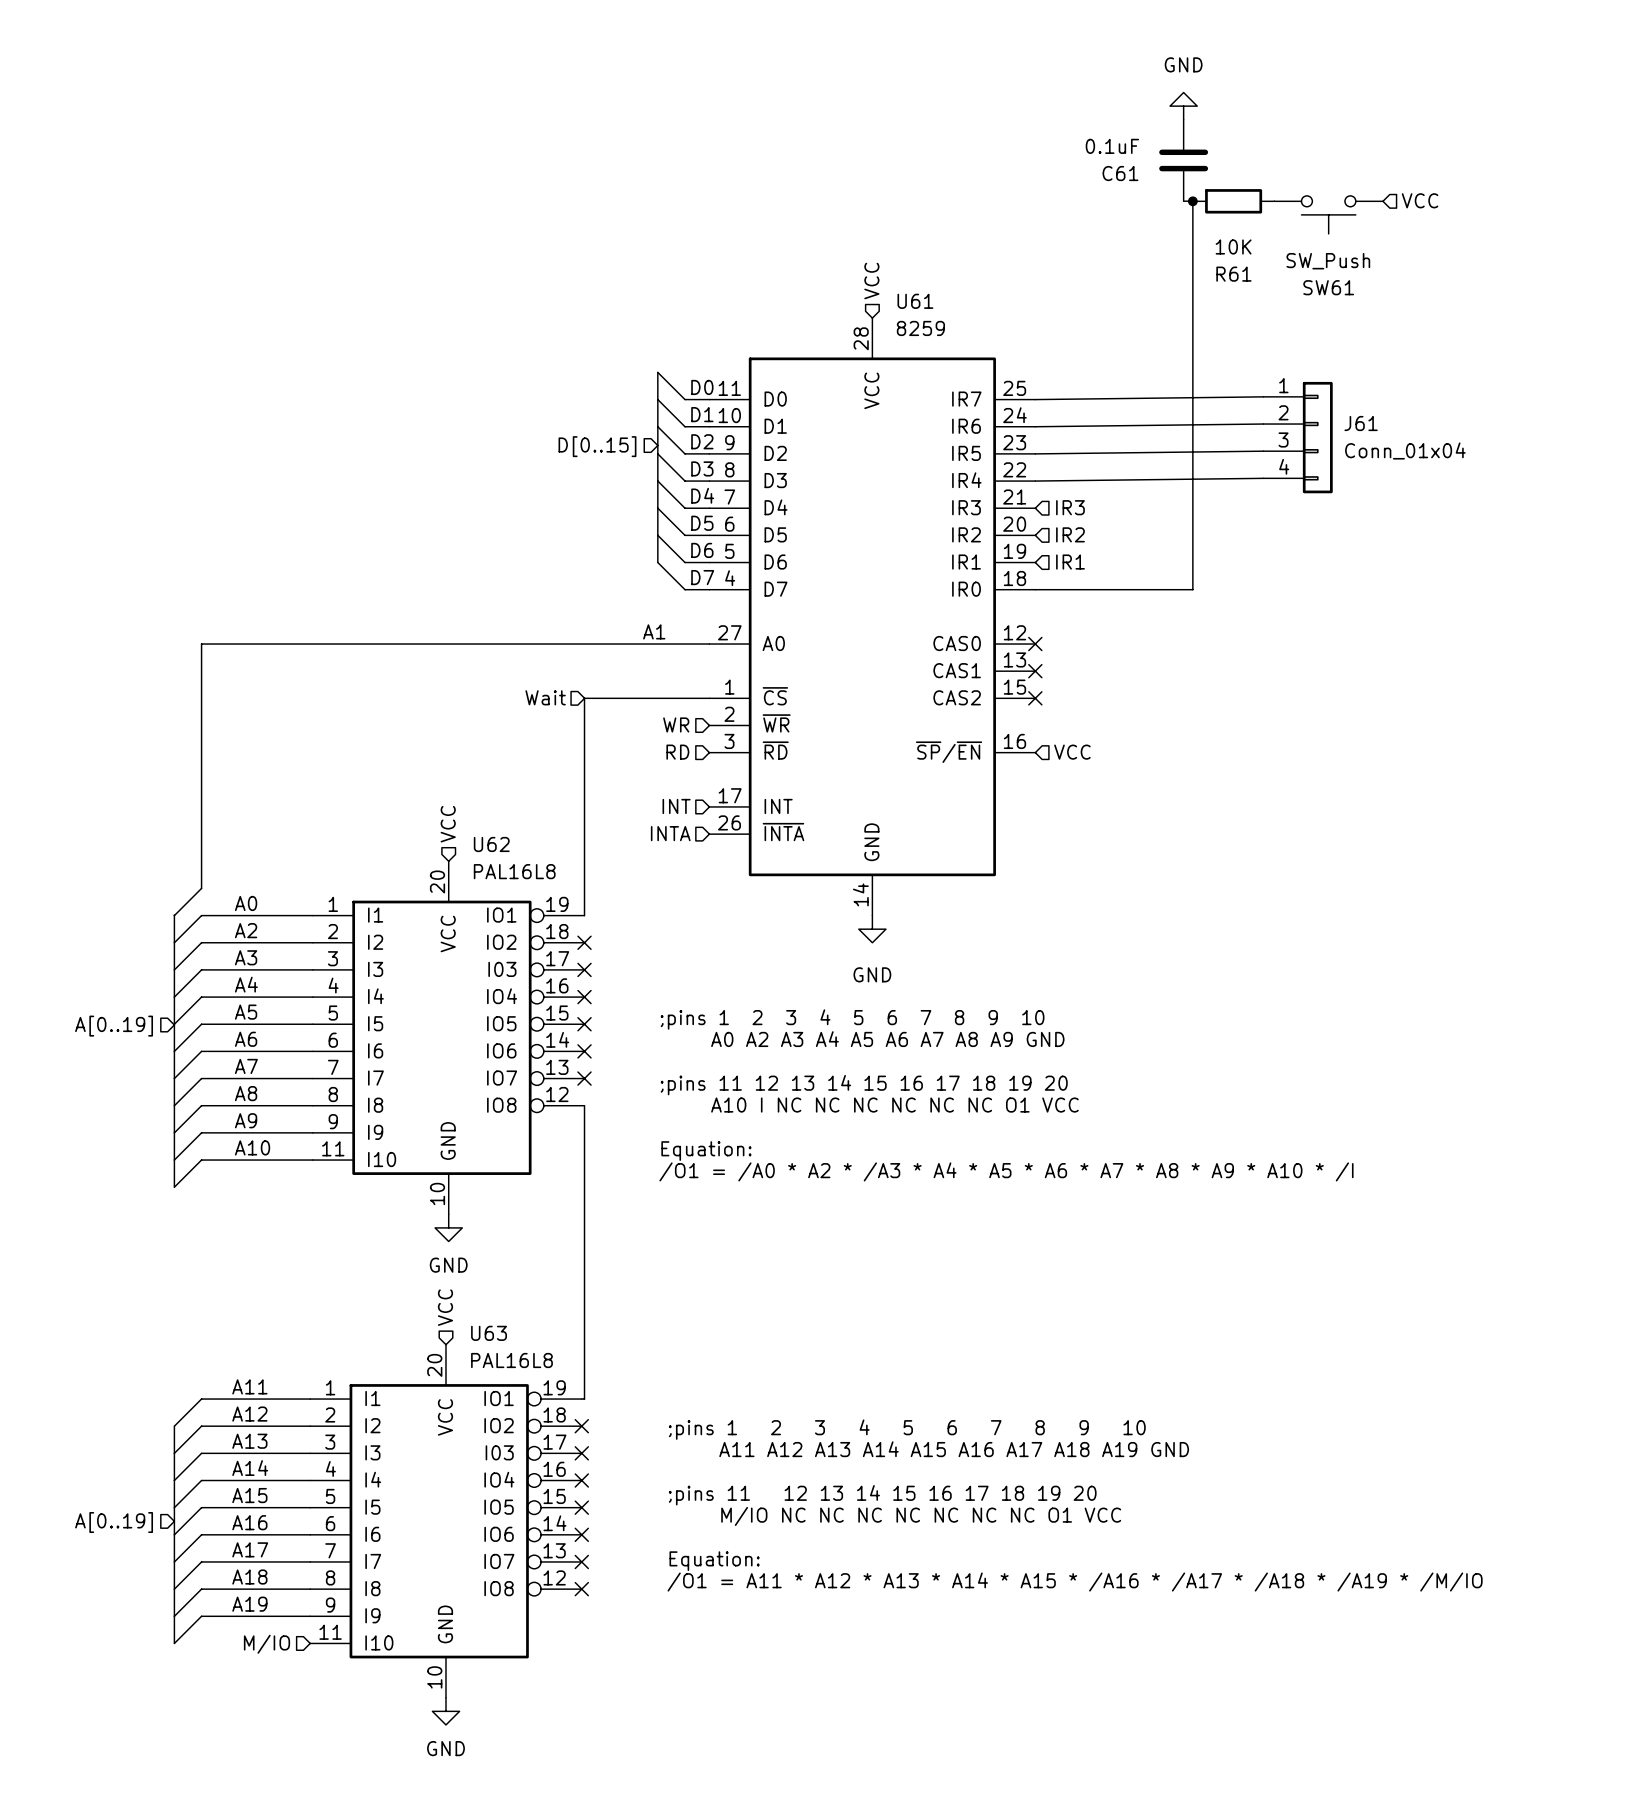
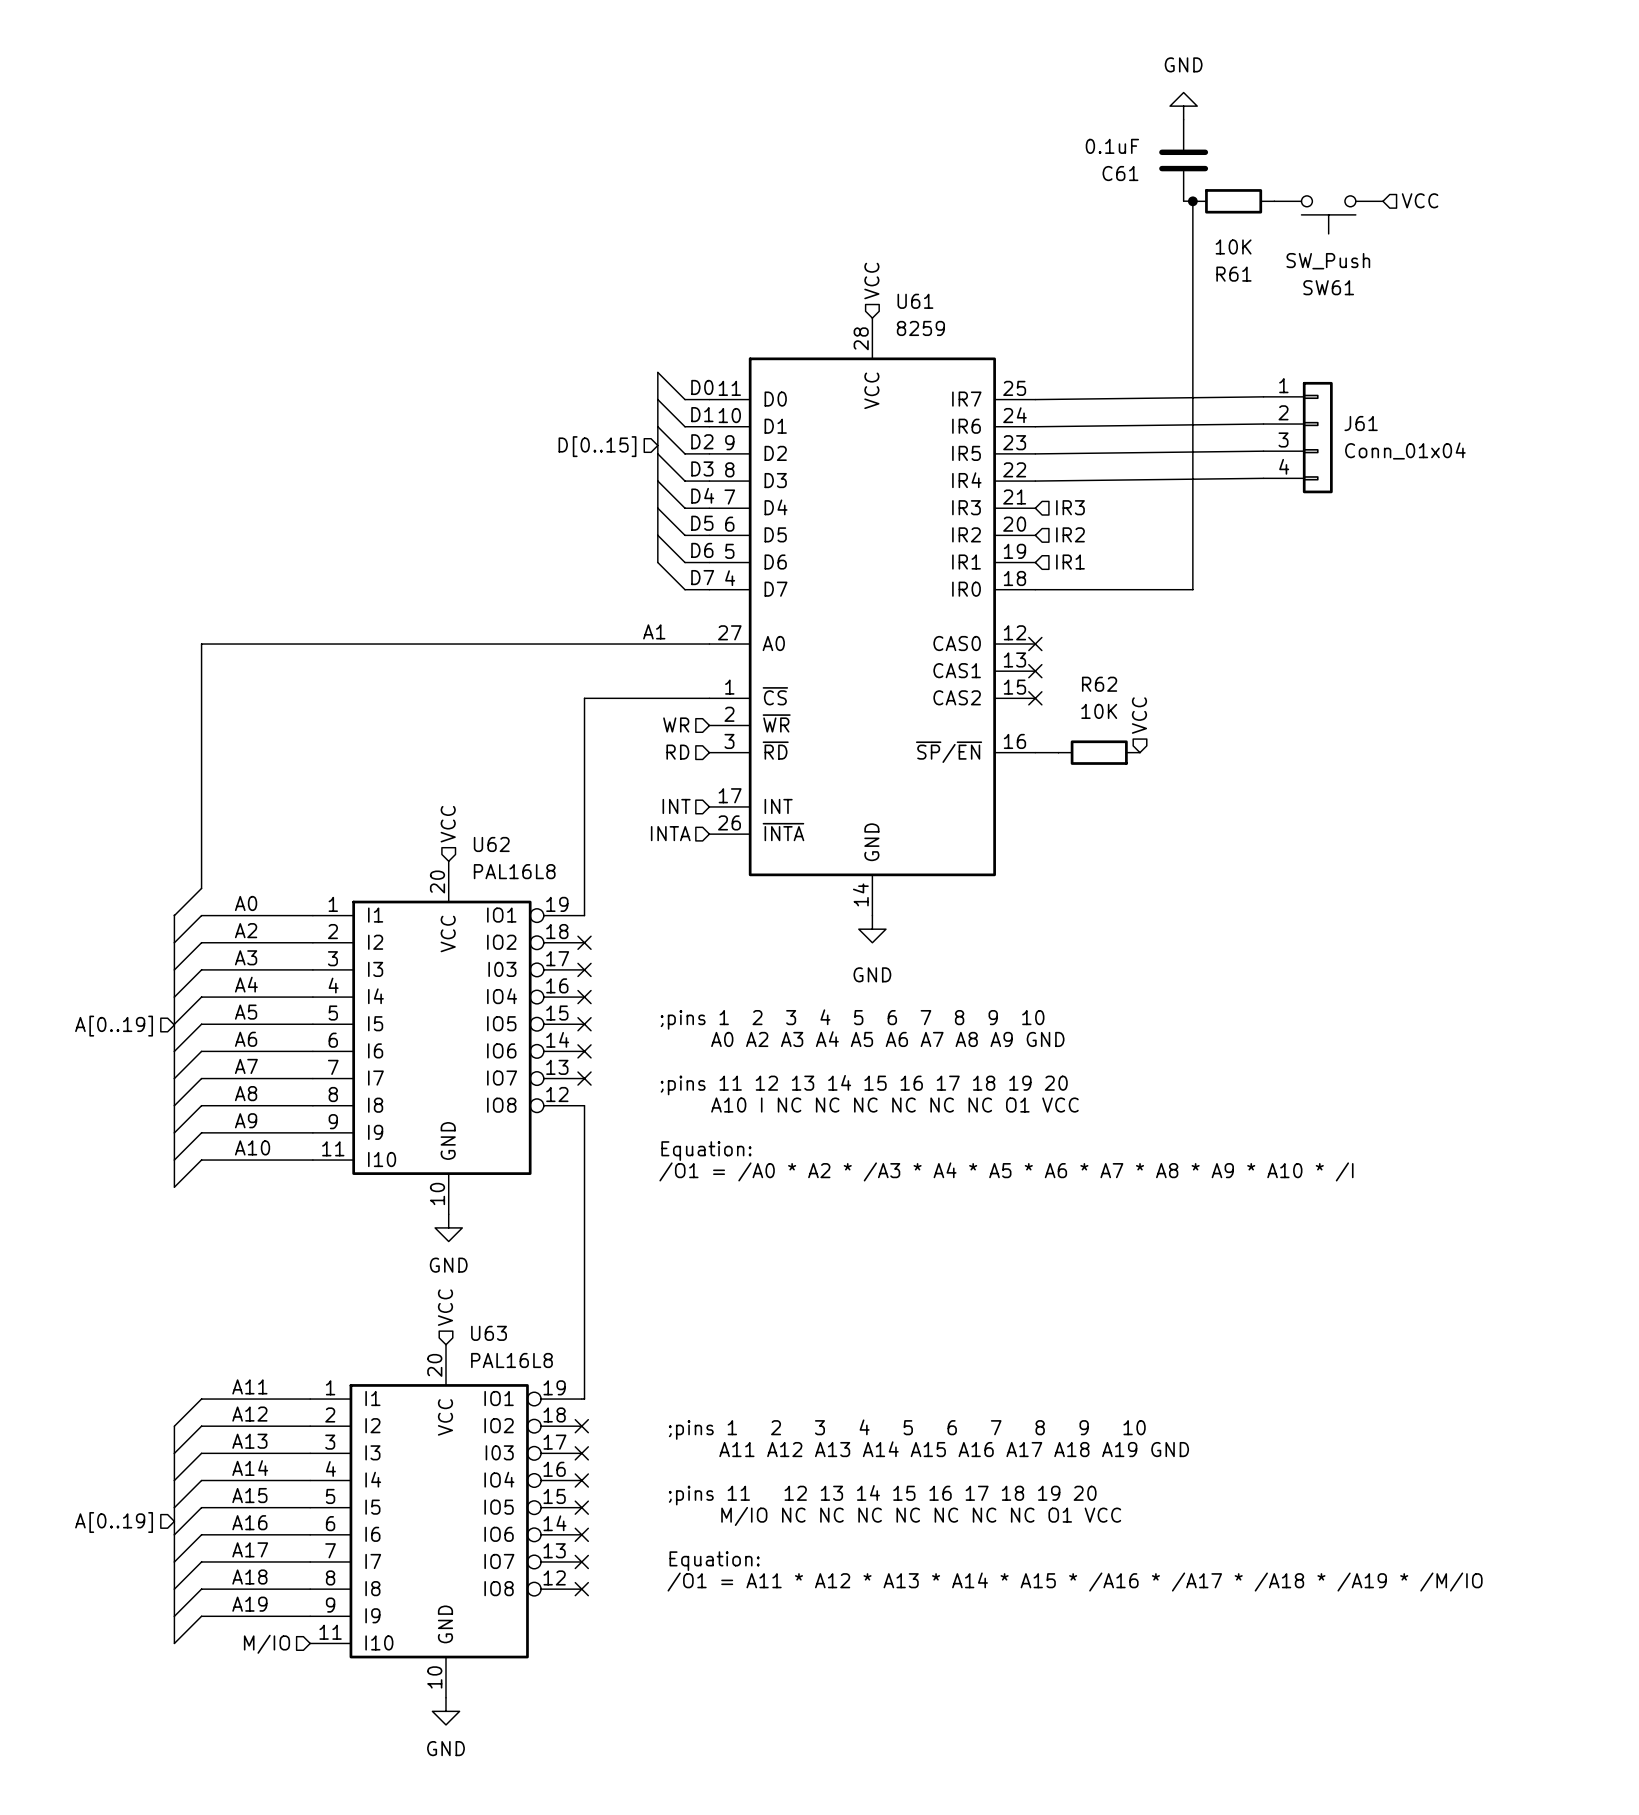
hierarchical label: Wait (545, 697) -> none
wire: none -> (1035, 752) (1058, 752)
hierarchical label rotation: 0° (1072, 752) -> 90° counterclockwise (1139, 715)
hierarchical label position: VCC (1072, 752) -> VCC (1139, 715)
R62: none -> 10K (1099, 752)

